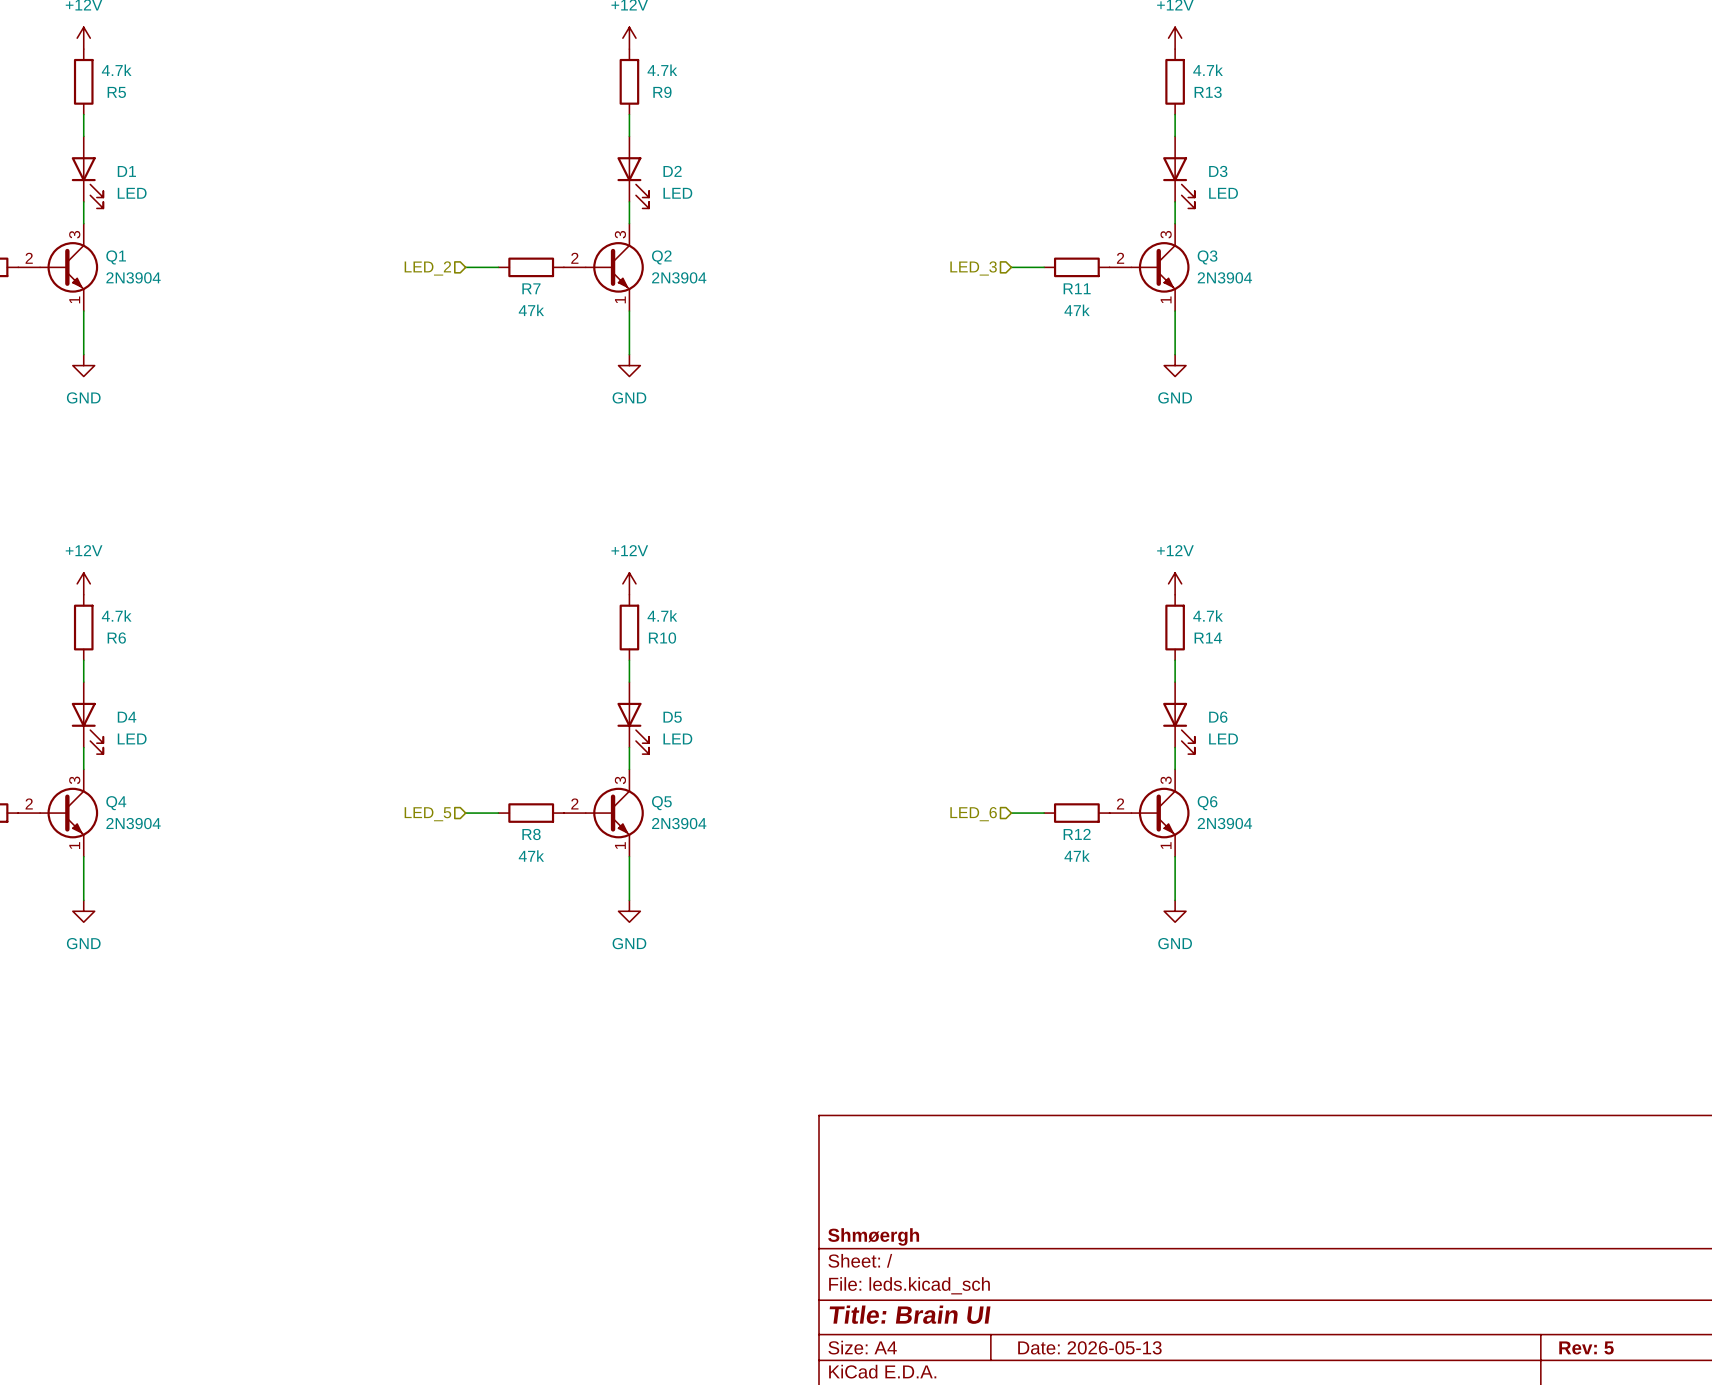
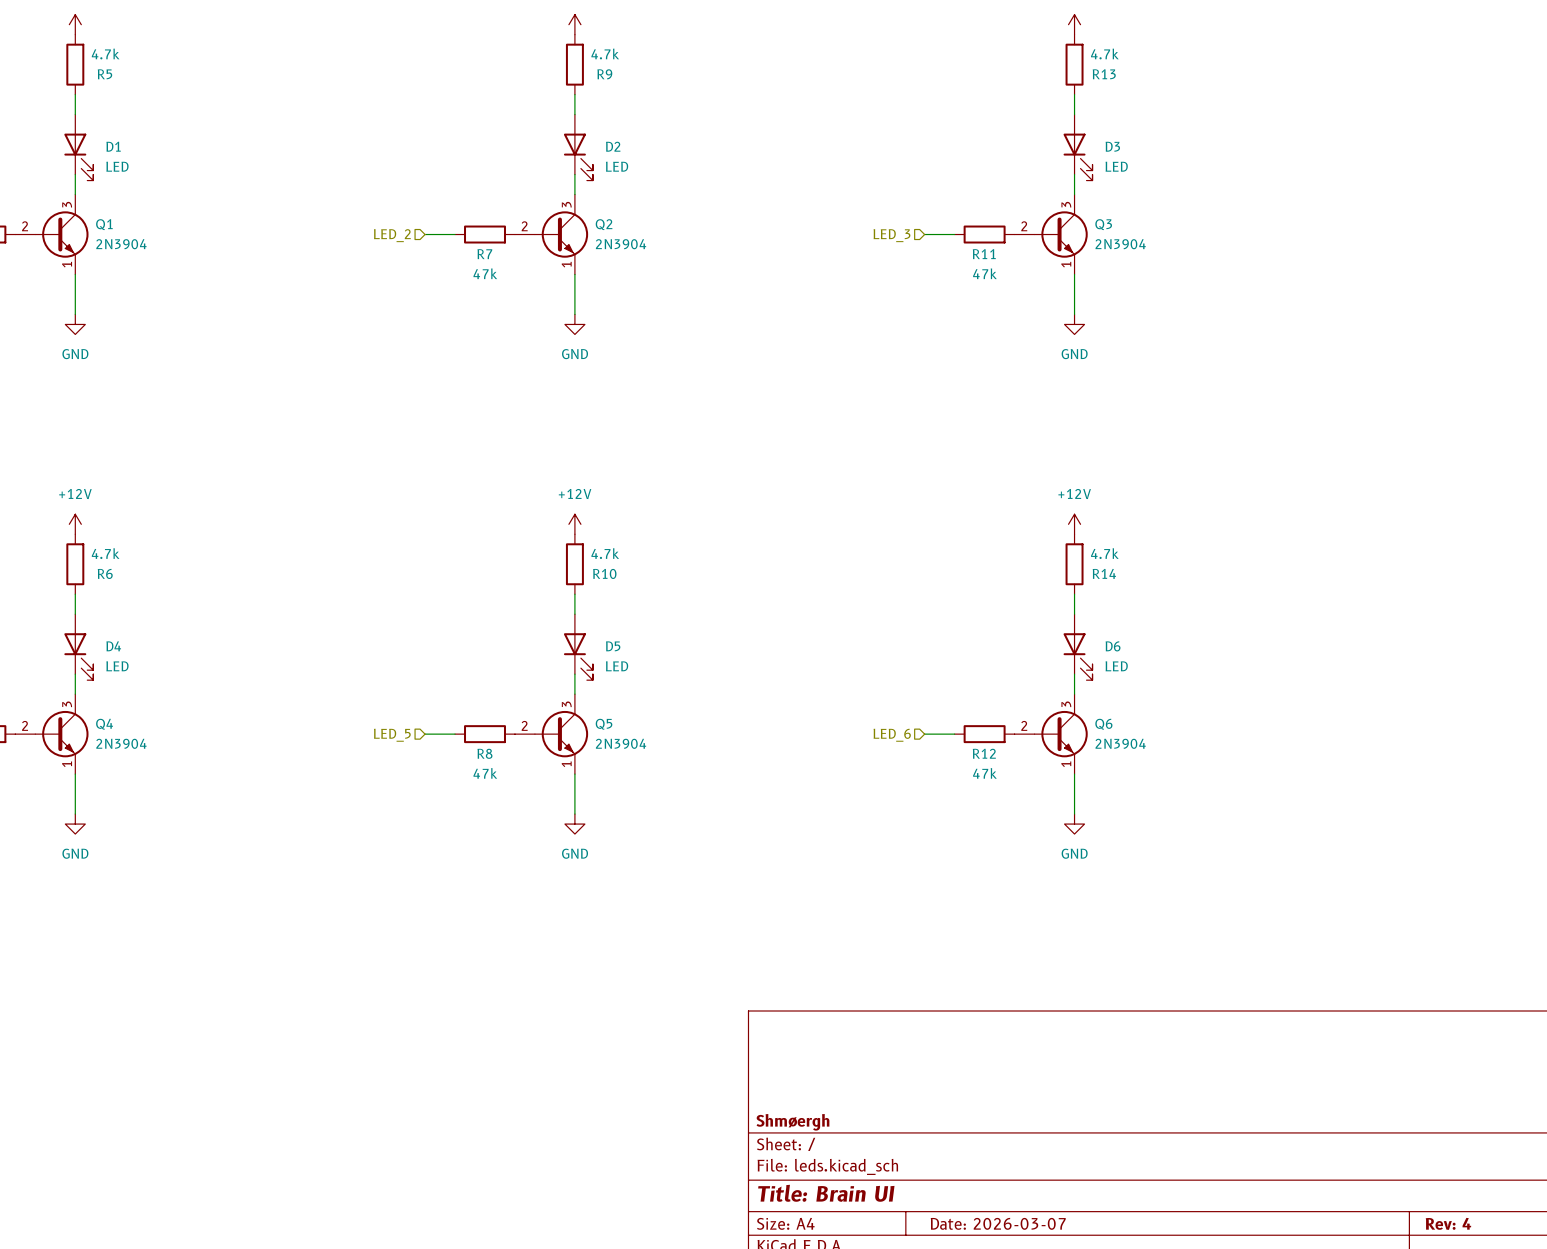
title block: Date: 2026-05-13 (1089, 1347) -> Date: 2026-03-07 (998, 1223)
title block: Rev: 5 (1586, 1347) -> Rev: 4 (1448, 1223)

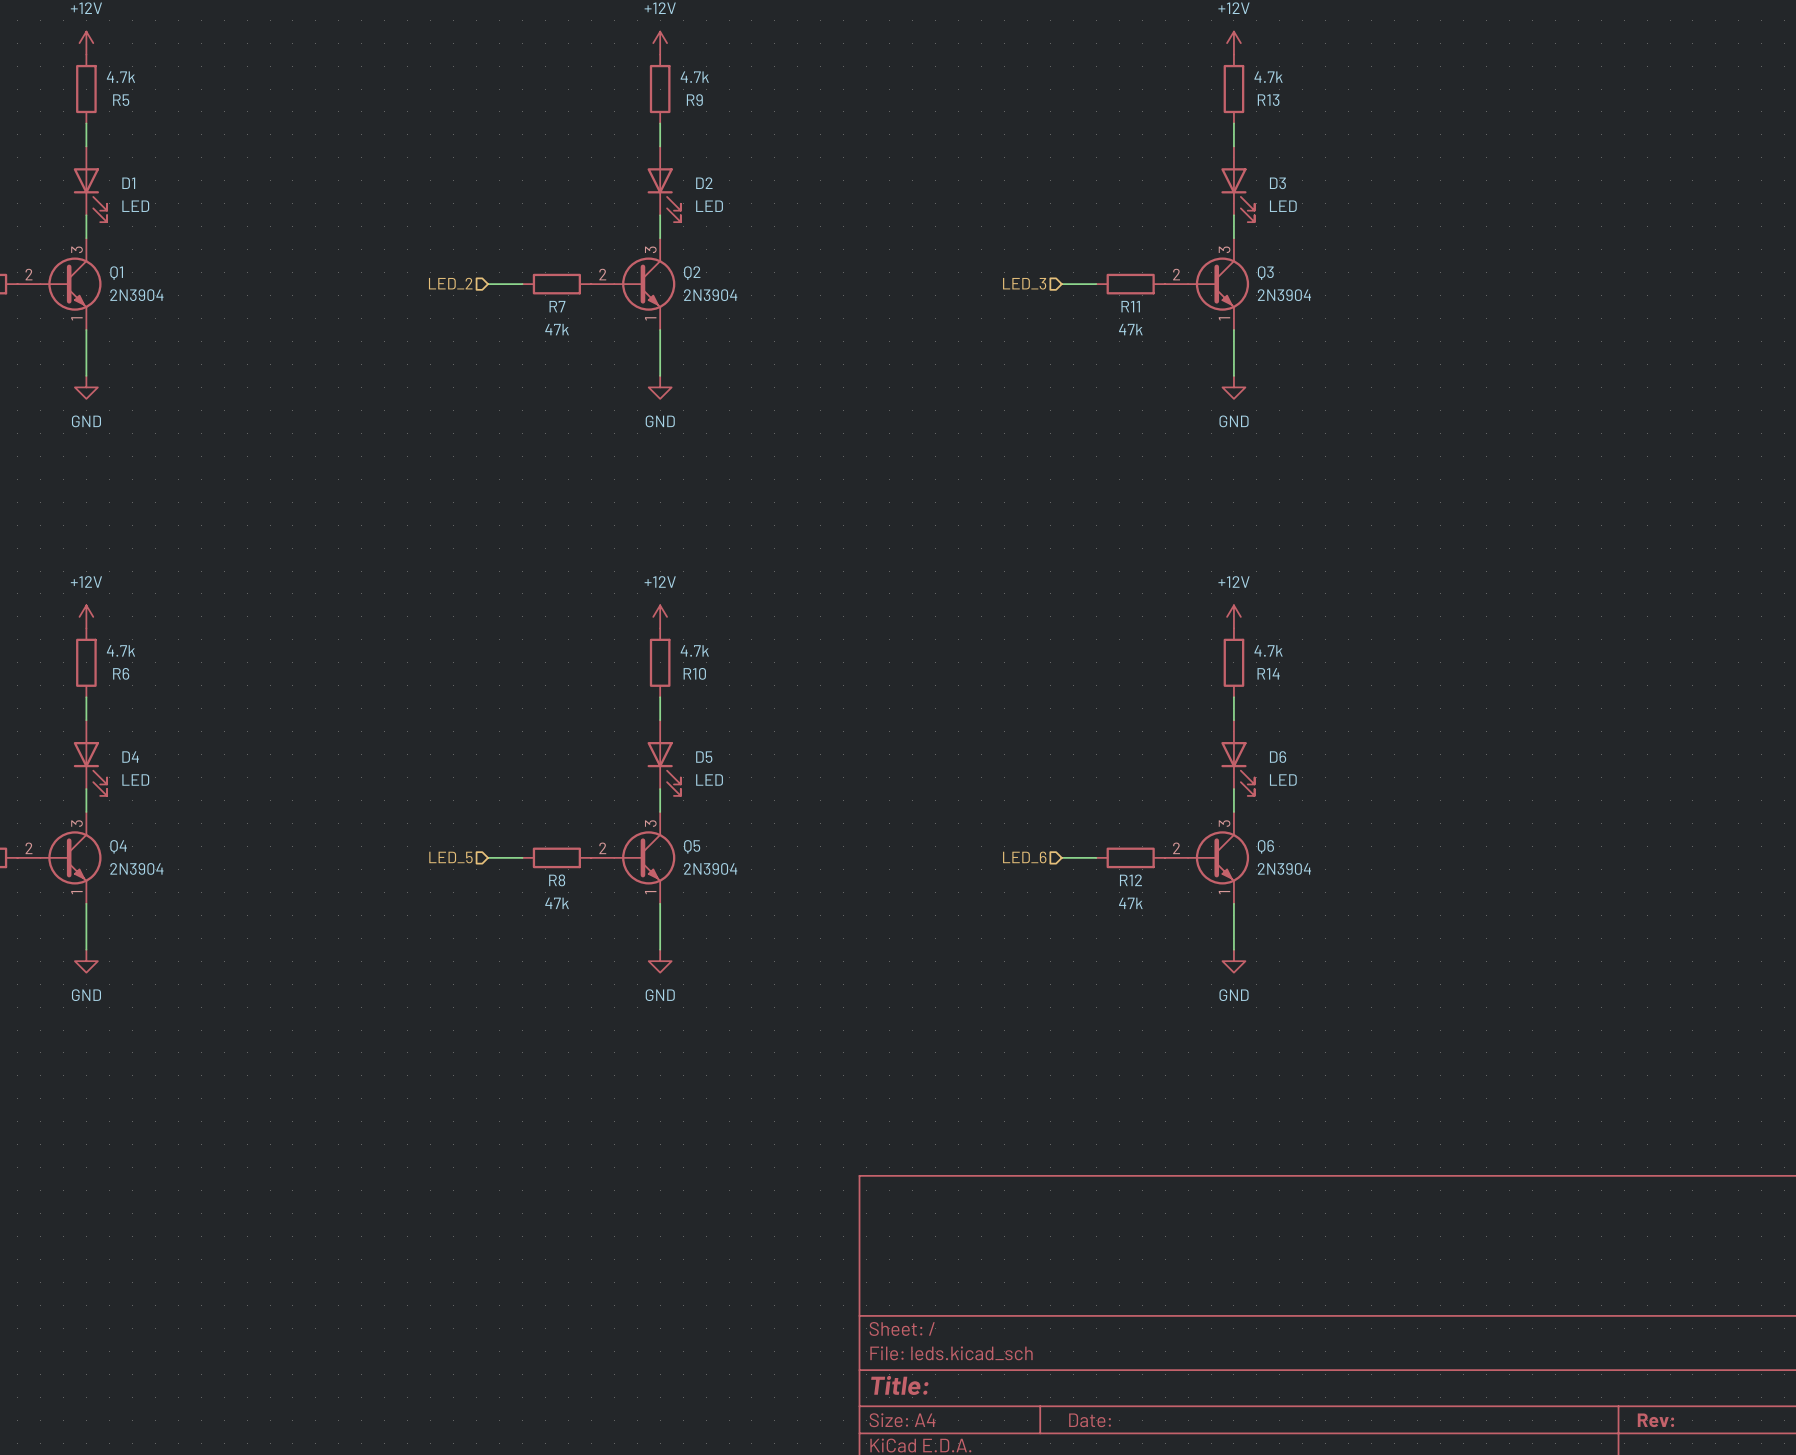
title block: Shmøergh (792, 1122) -> none
title block: Title: Brain UI (826, 1193) -> Title: (899, 1385)
title block: Date: 2026-03-07 (998, 1223) -> Date: (1090, 1420)
title block: Rev: 4 (1448, 1223) -> Rev: (1655, 1420)

